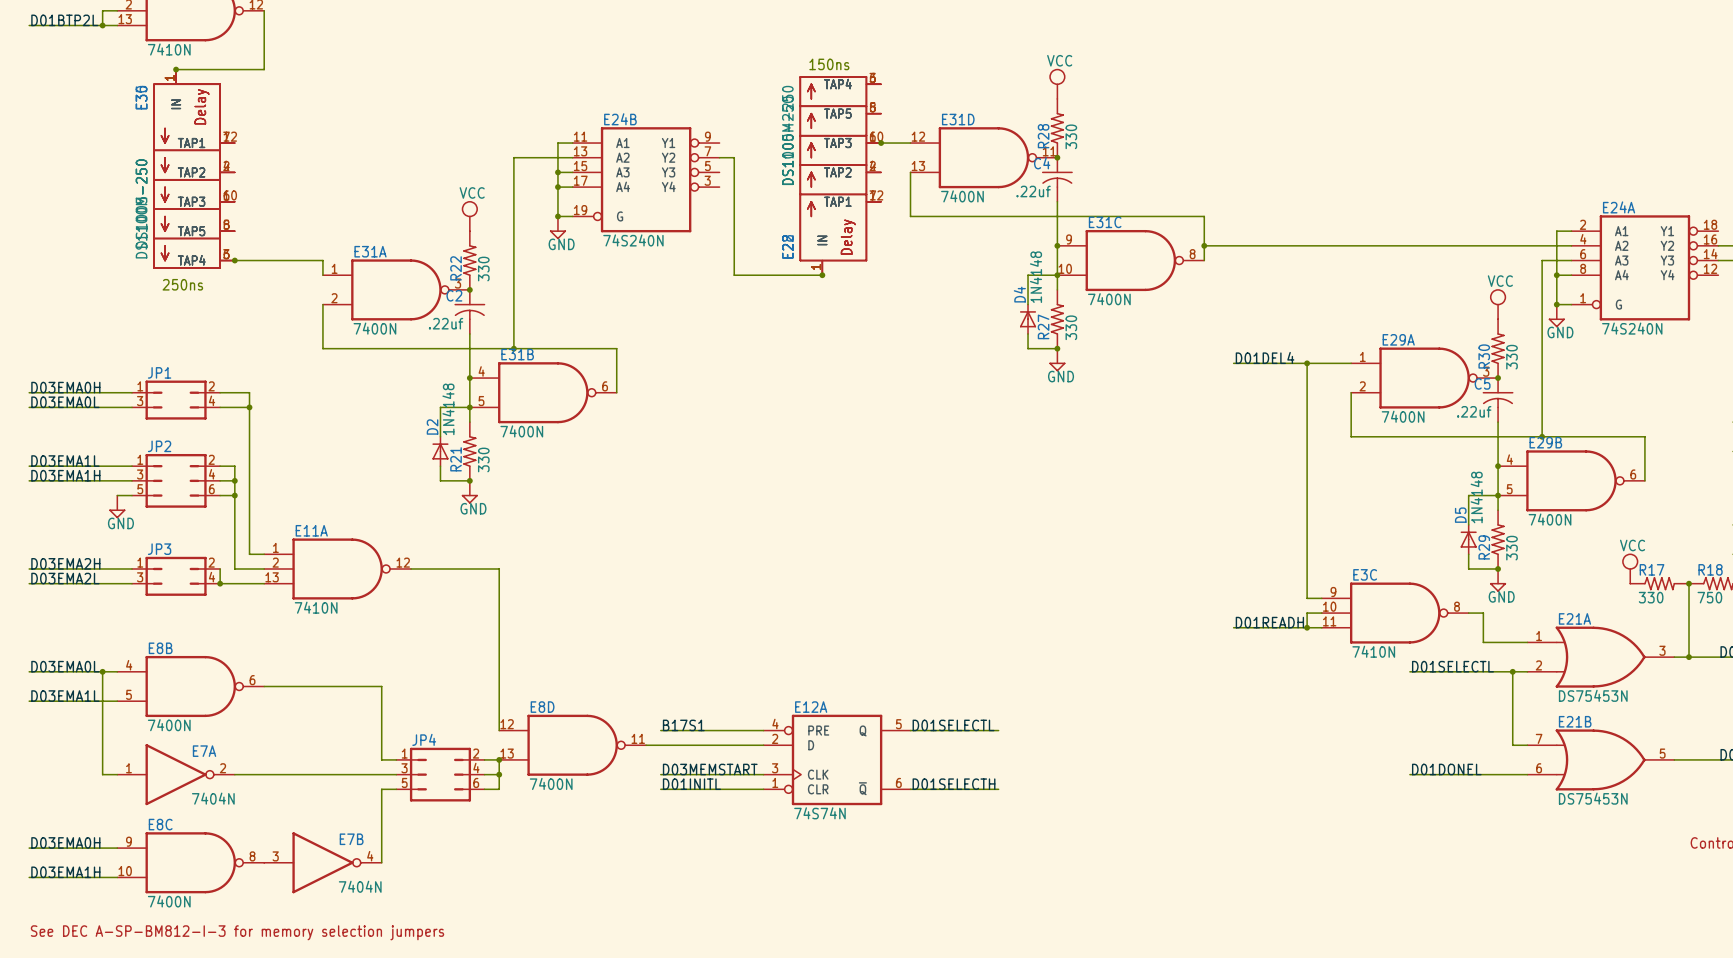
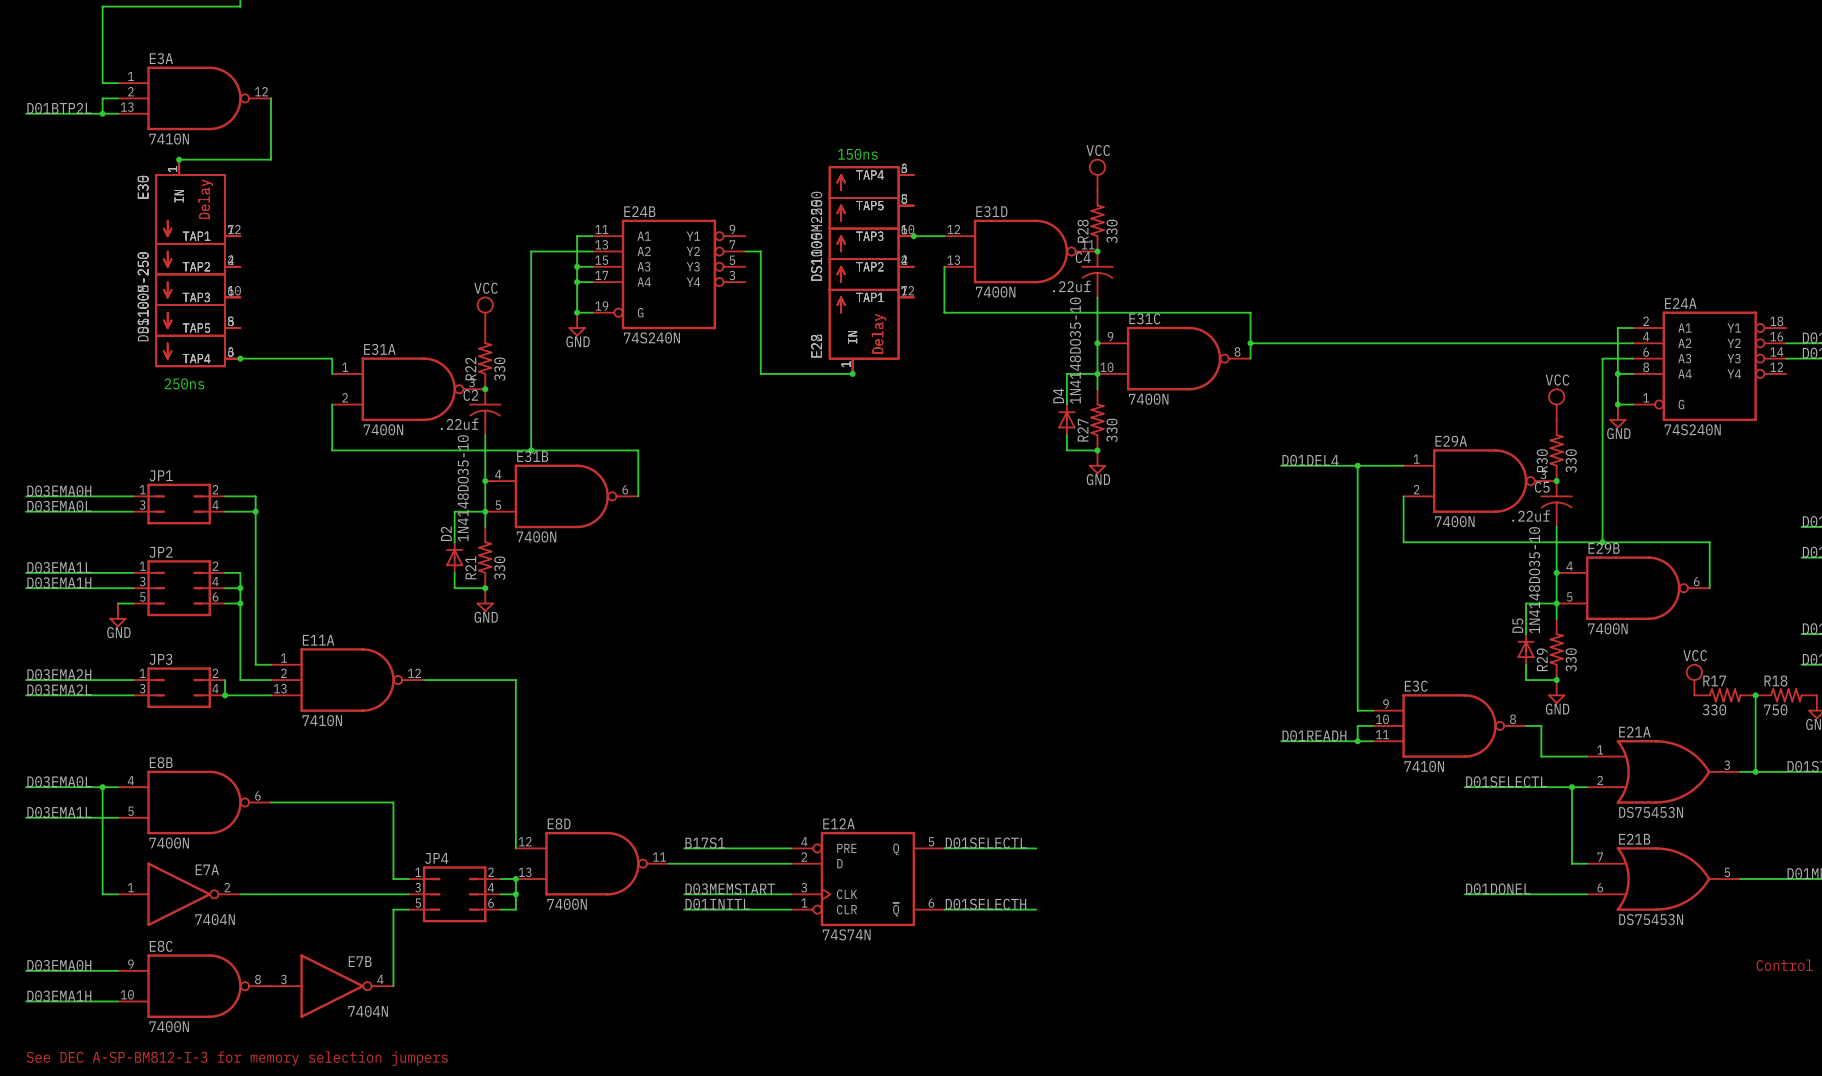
D4 value: 1N4148 (1035, 277) -> 1N4148DO35-10 (1075, 350)
D2 value: 1N4148 (448, 409) -> 1N4148DO35-10 (463, 488)
D5 value: 1N4148 (1476, 497) -> 1N4148DO35-10 (1534, 580)

